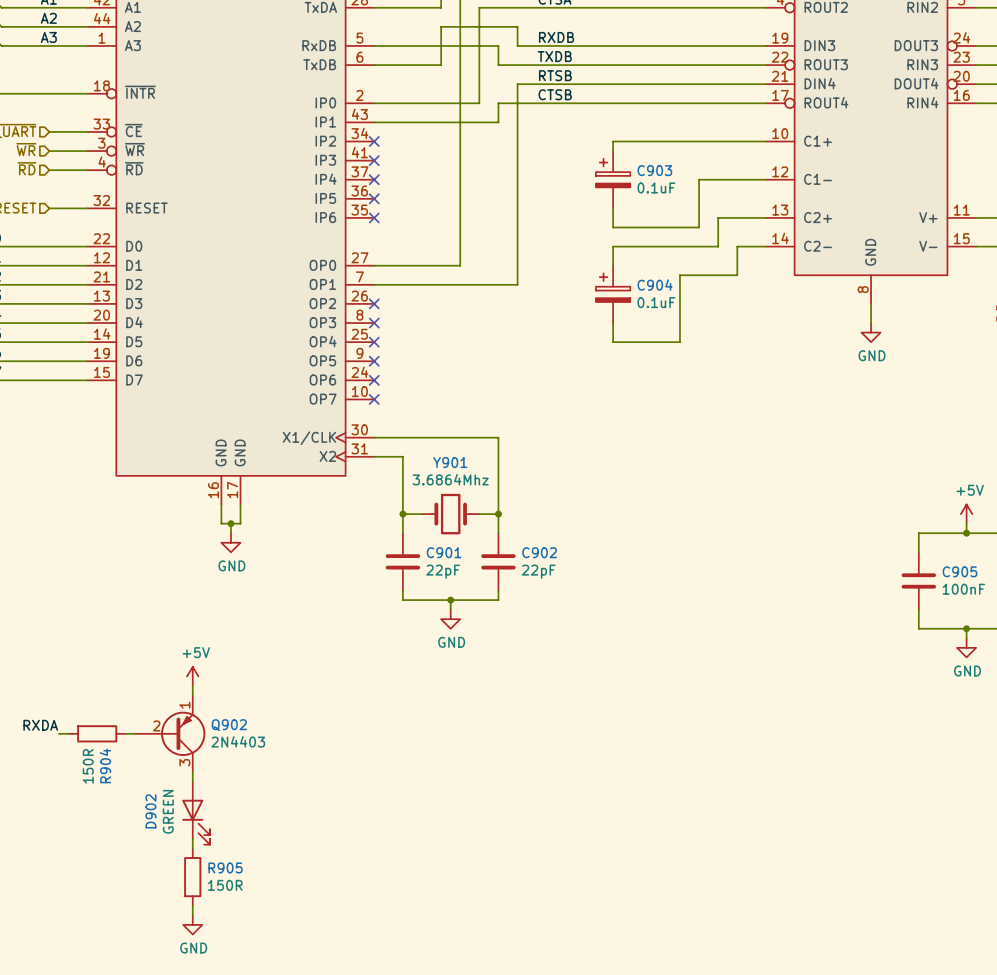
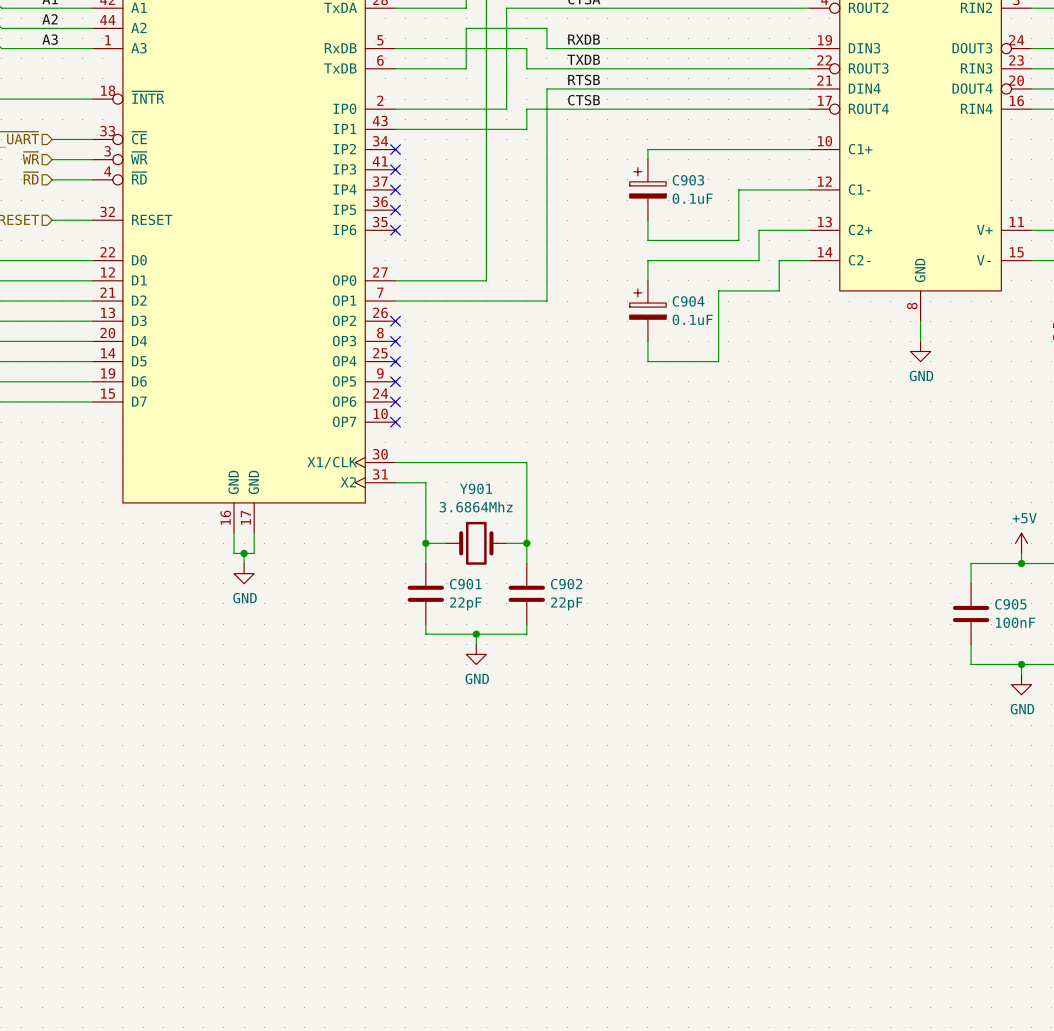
power symbol: +5V (192, 676) -> none
wire: (192, 686) (192, 695) -> none
label: RXDA (40, 725) -> none
wire: (59, 733) (68, 733) -> none
R904: 150R (97, 733) -> none
wire: (125, 733) (135, 733) -> none
Q902: 2N4403 (170, 733) -> none
wire: (192, 772) (192, 781) -> none
D902: GREEN (196, 813) -> none
wire: (192, 838) (192, 848) -> none
R905: 150R (192, 877) -> none
wire: (192, 905) (192, 915) -> none
power symbol: GND (192, 924) -> none

